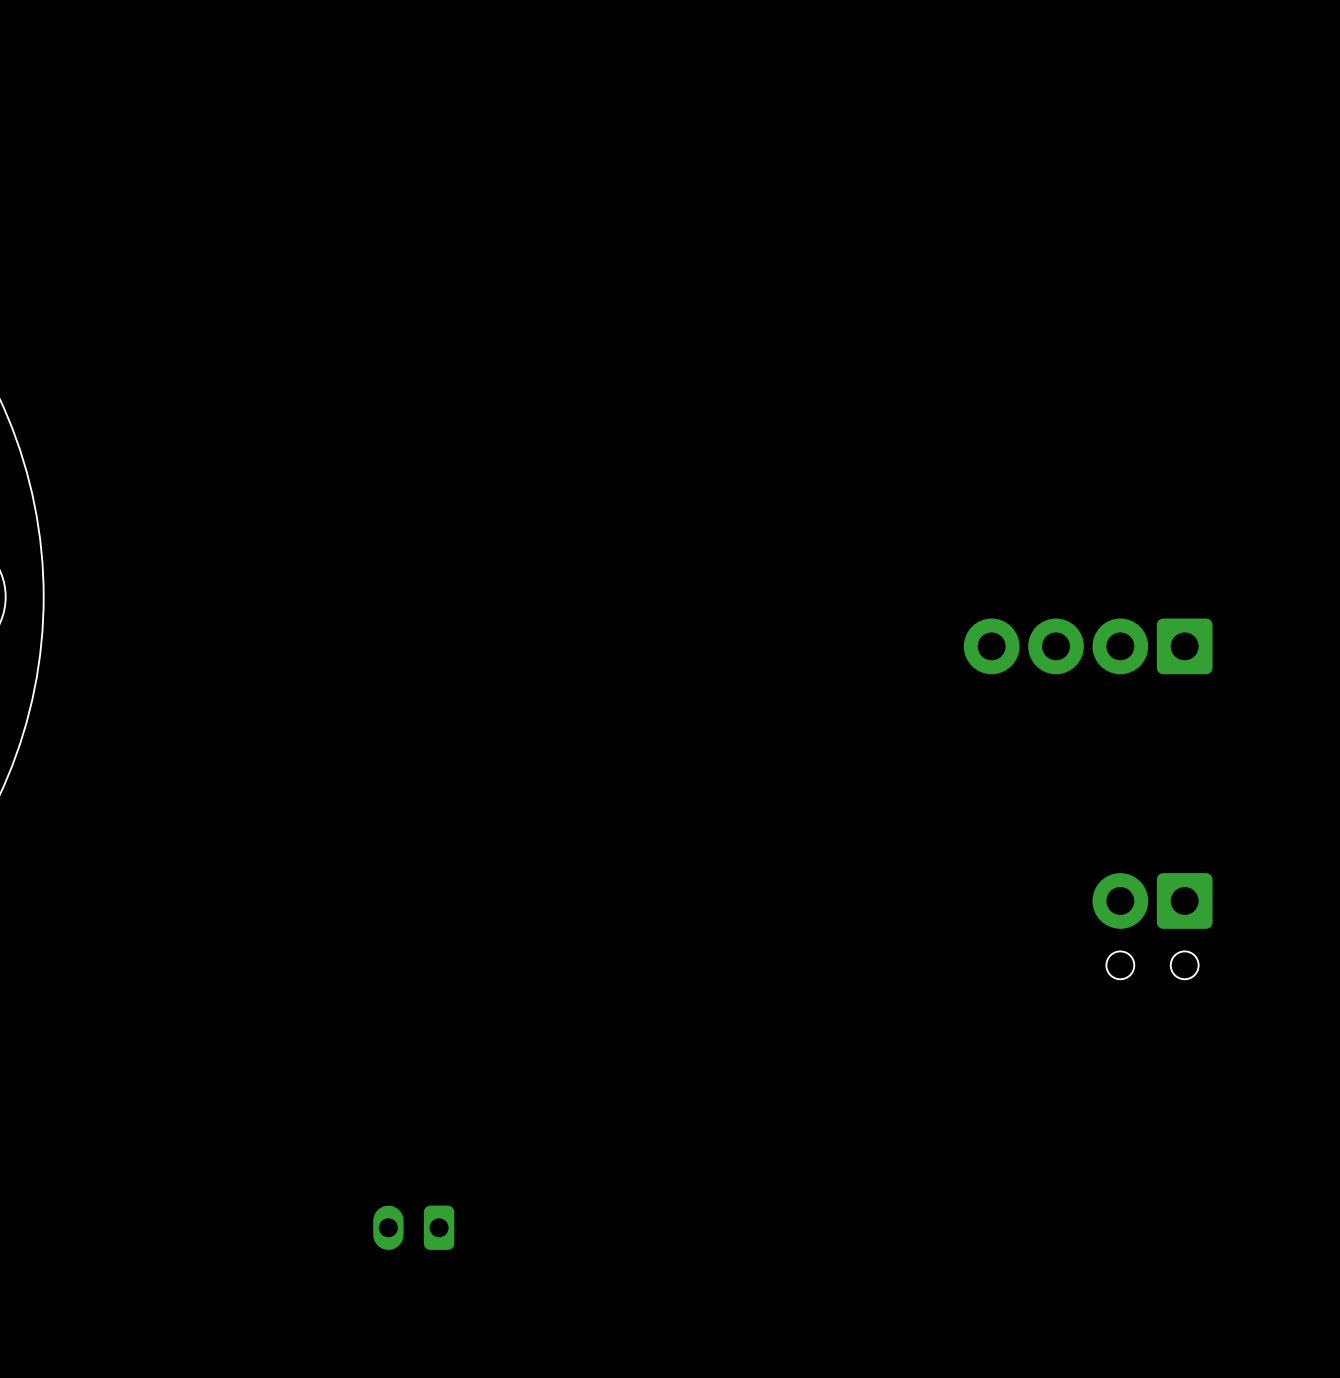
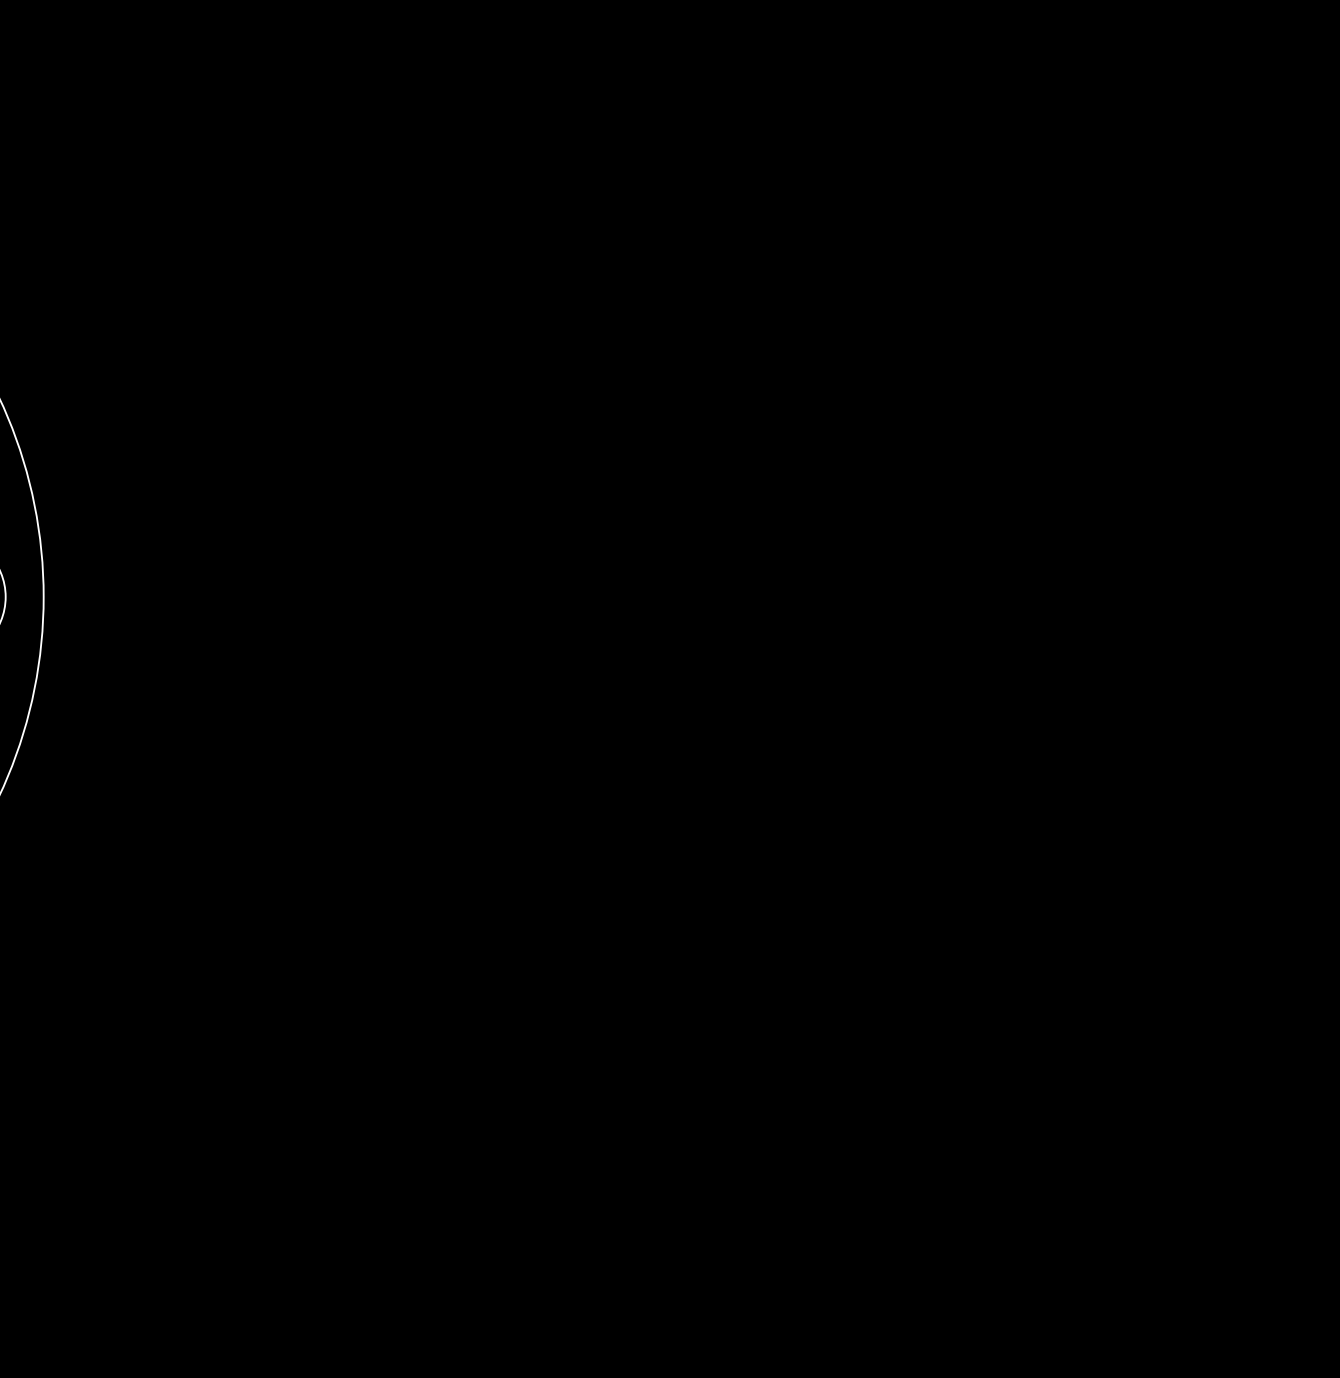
part: (1088, 646) -> none
part: (1152, 926) -> none
part: (413, 1227) -> none

